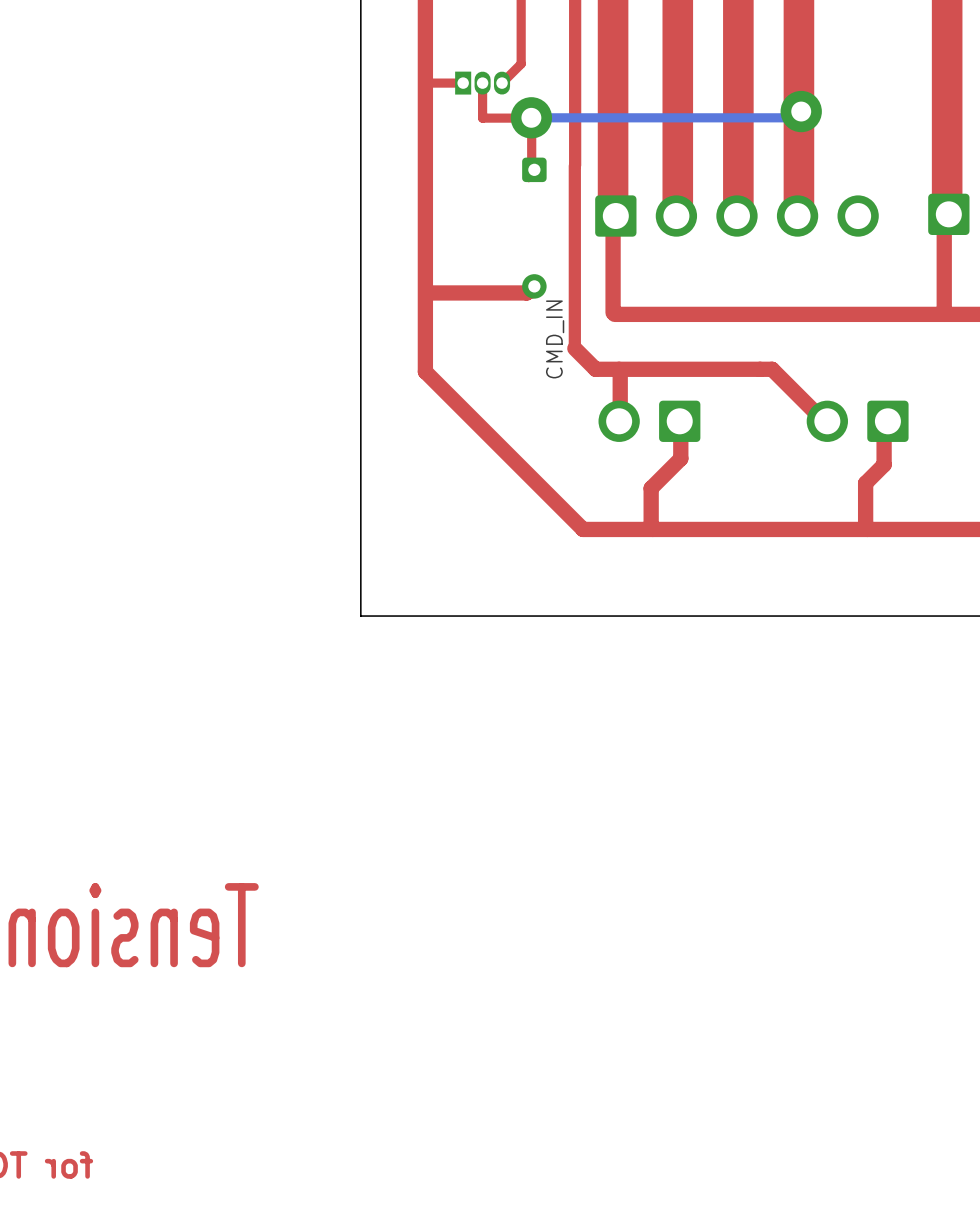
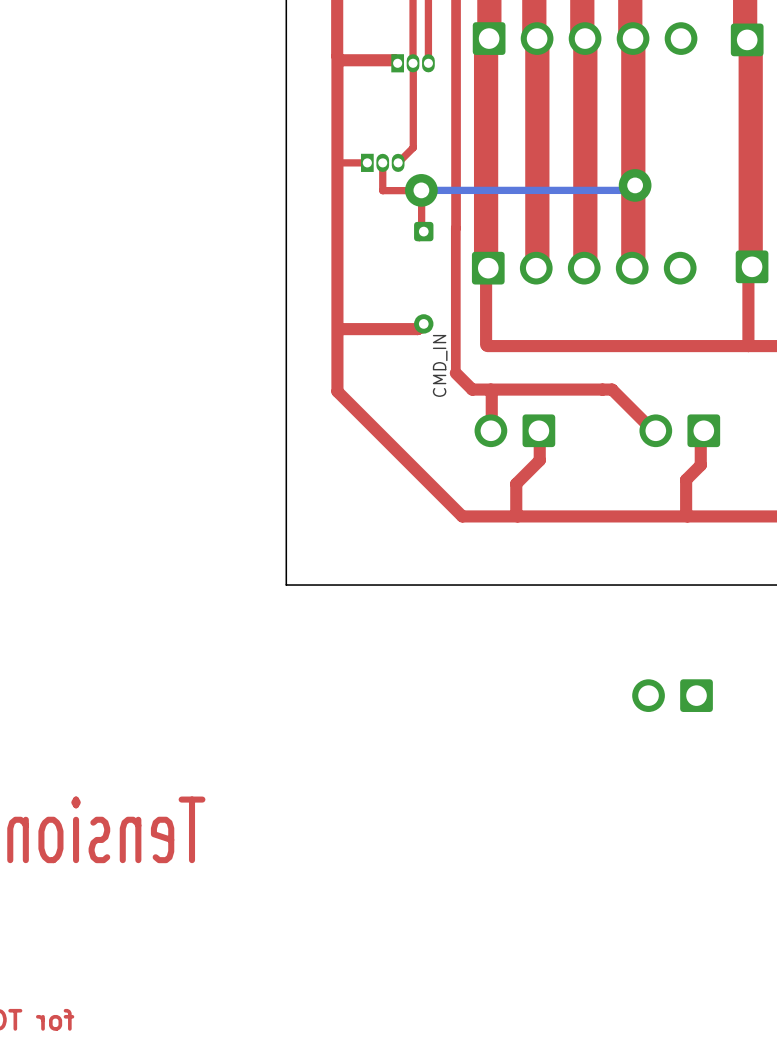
part: none -> (672, 695)

